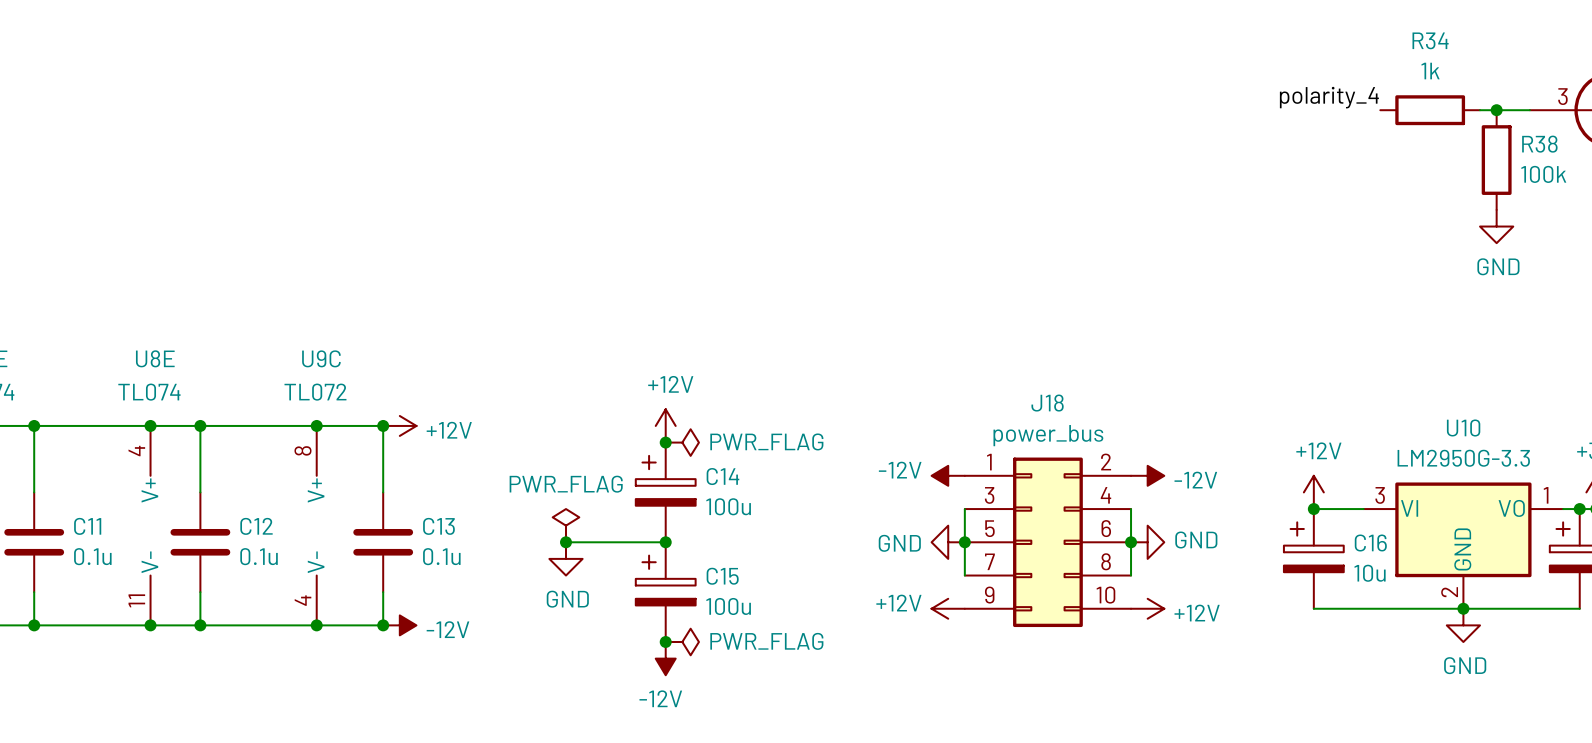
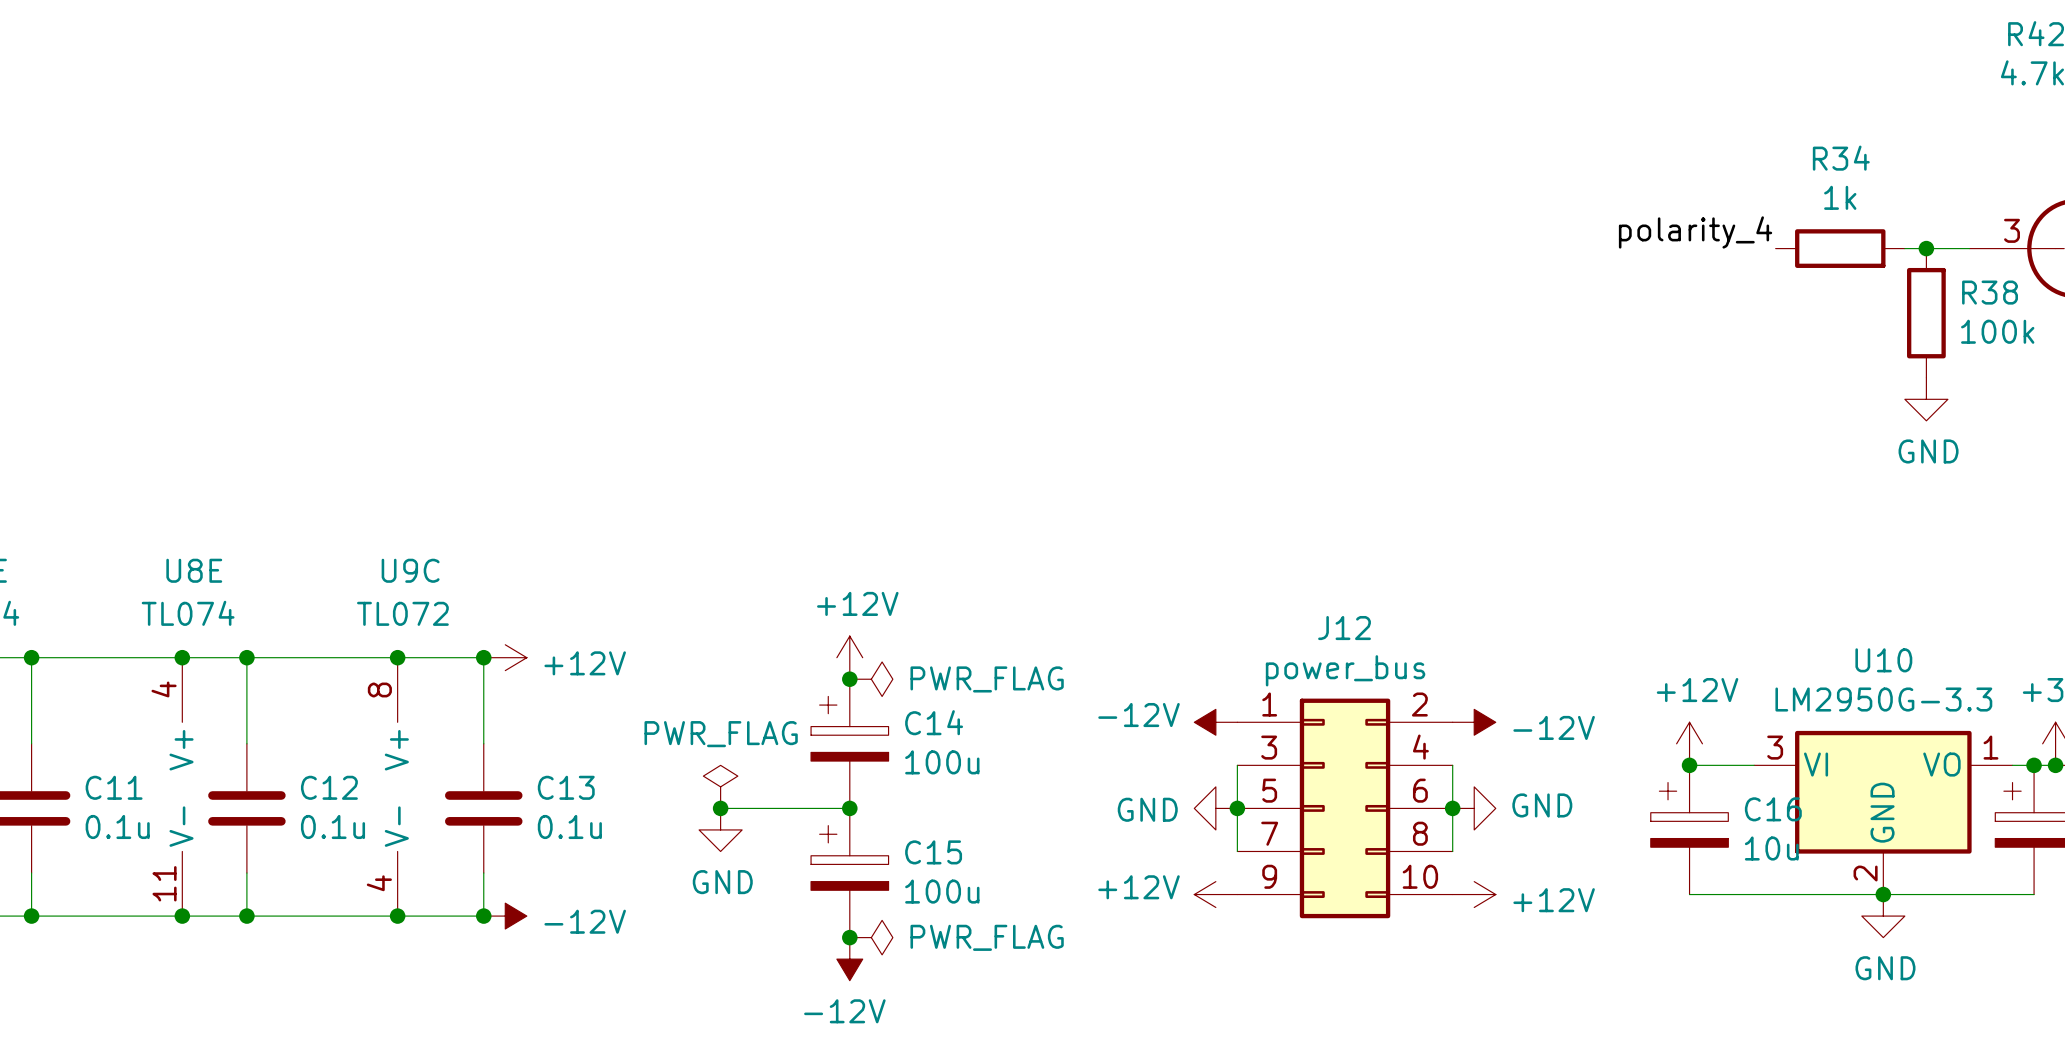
J18 name: J18 (1047, 403) -> J12 (1344, 628)

